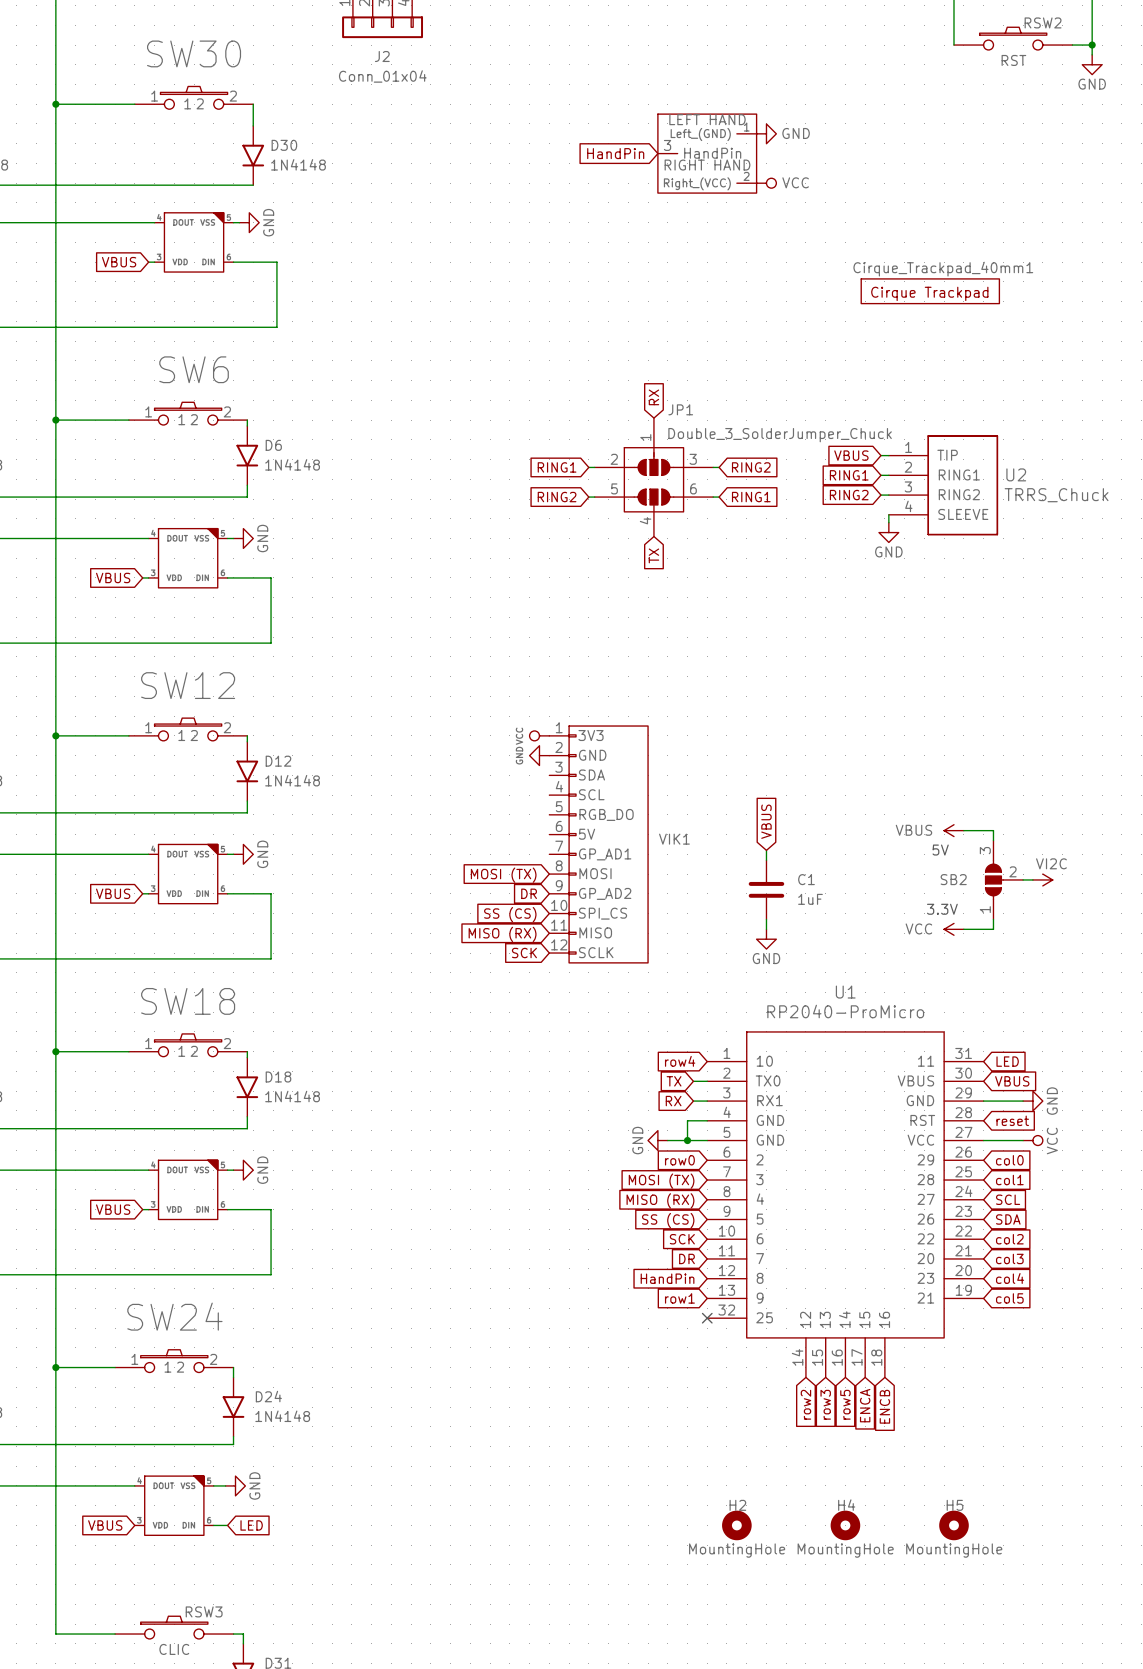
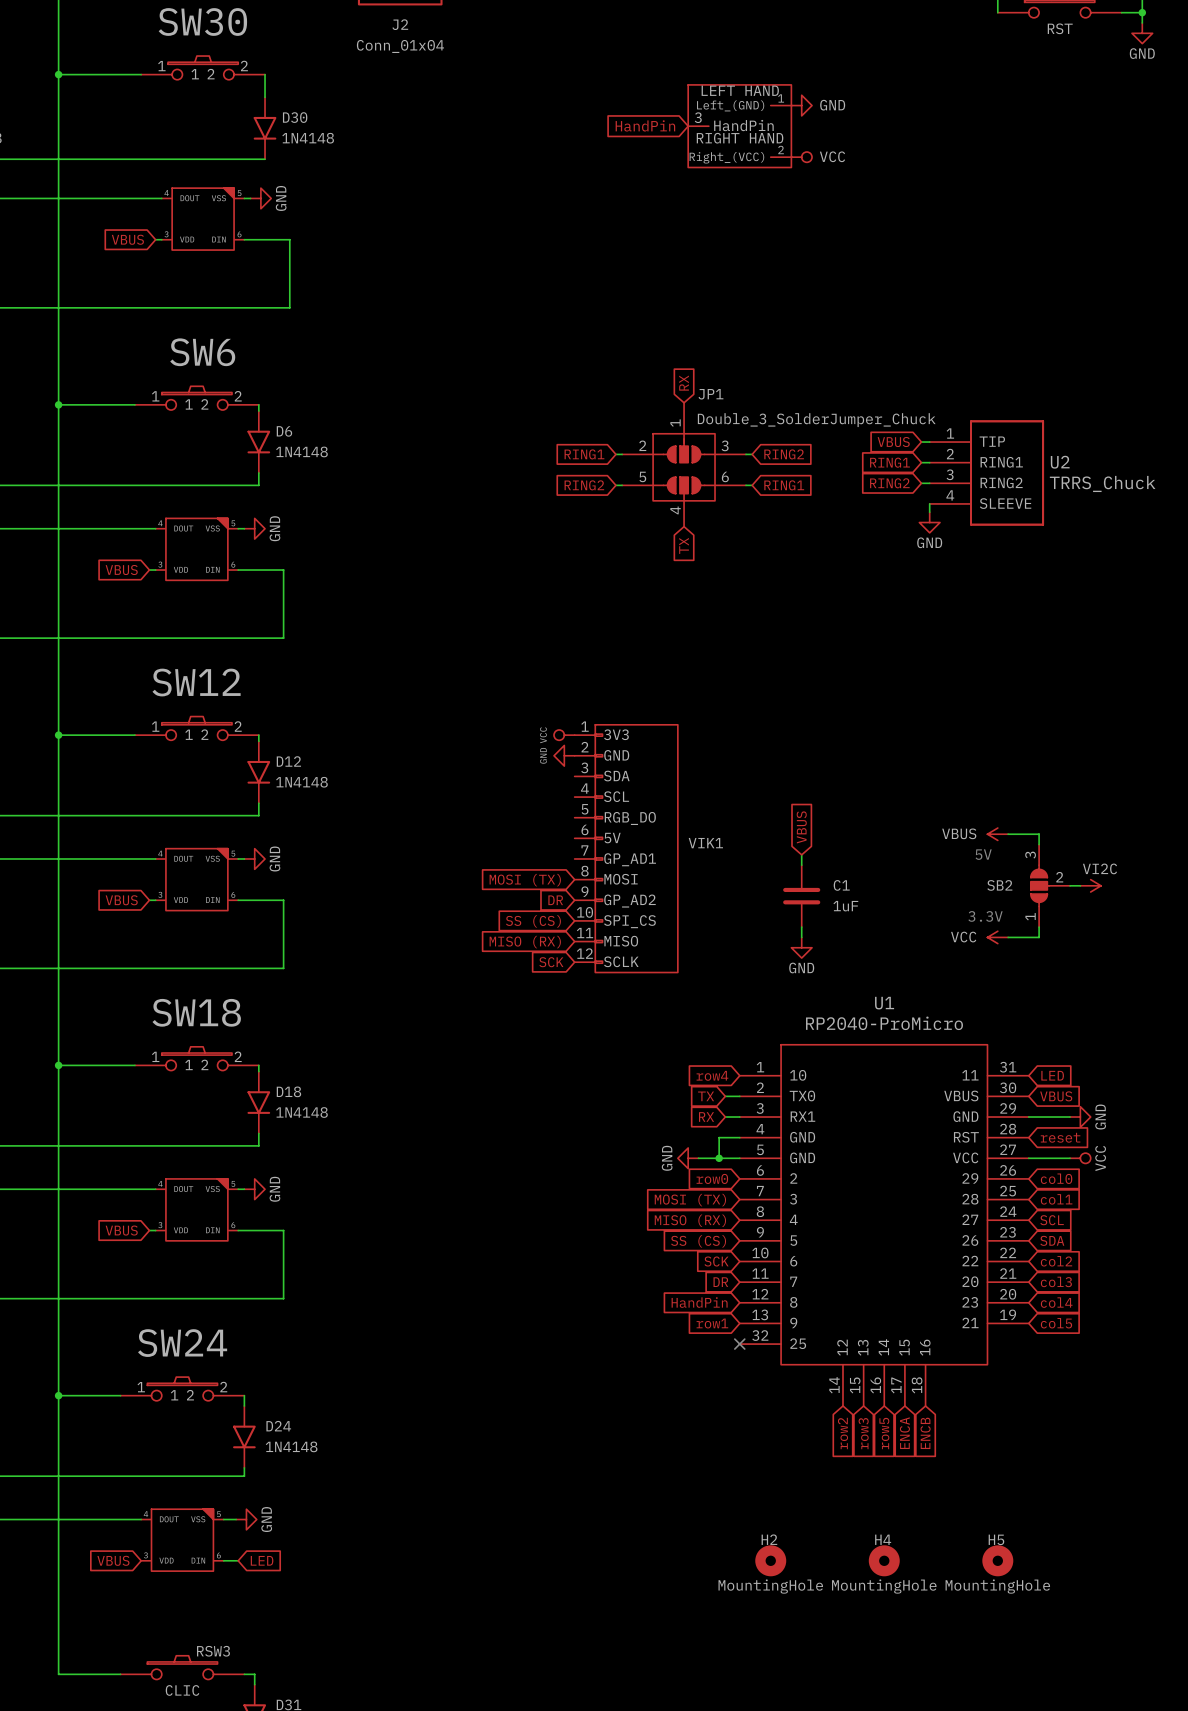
Cirque_Trackpad_40mm1: (930, 291) -> none

